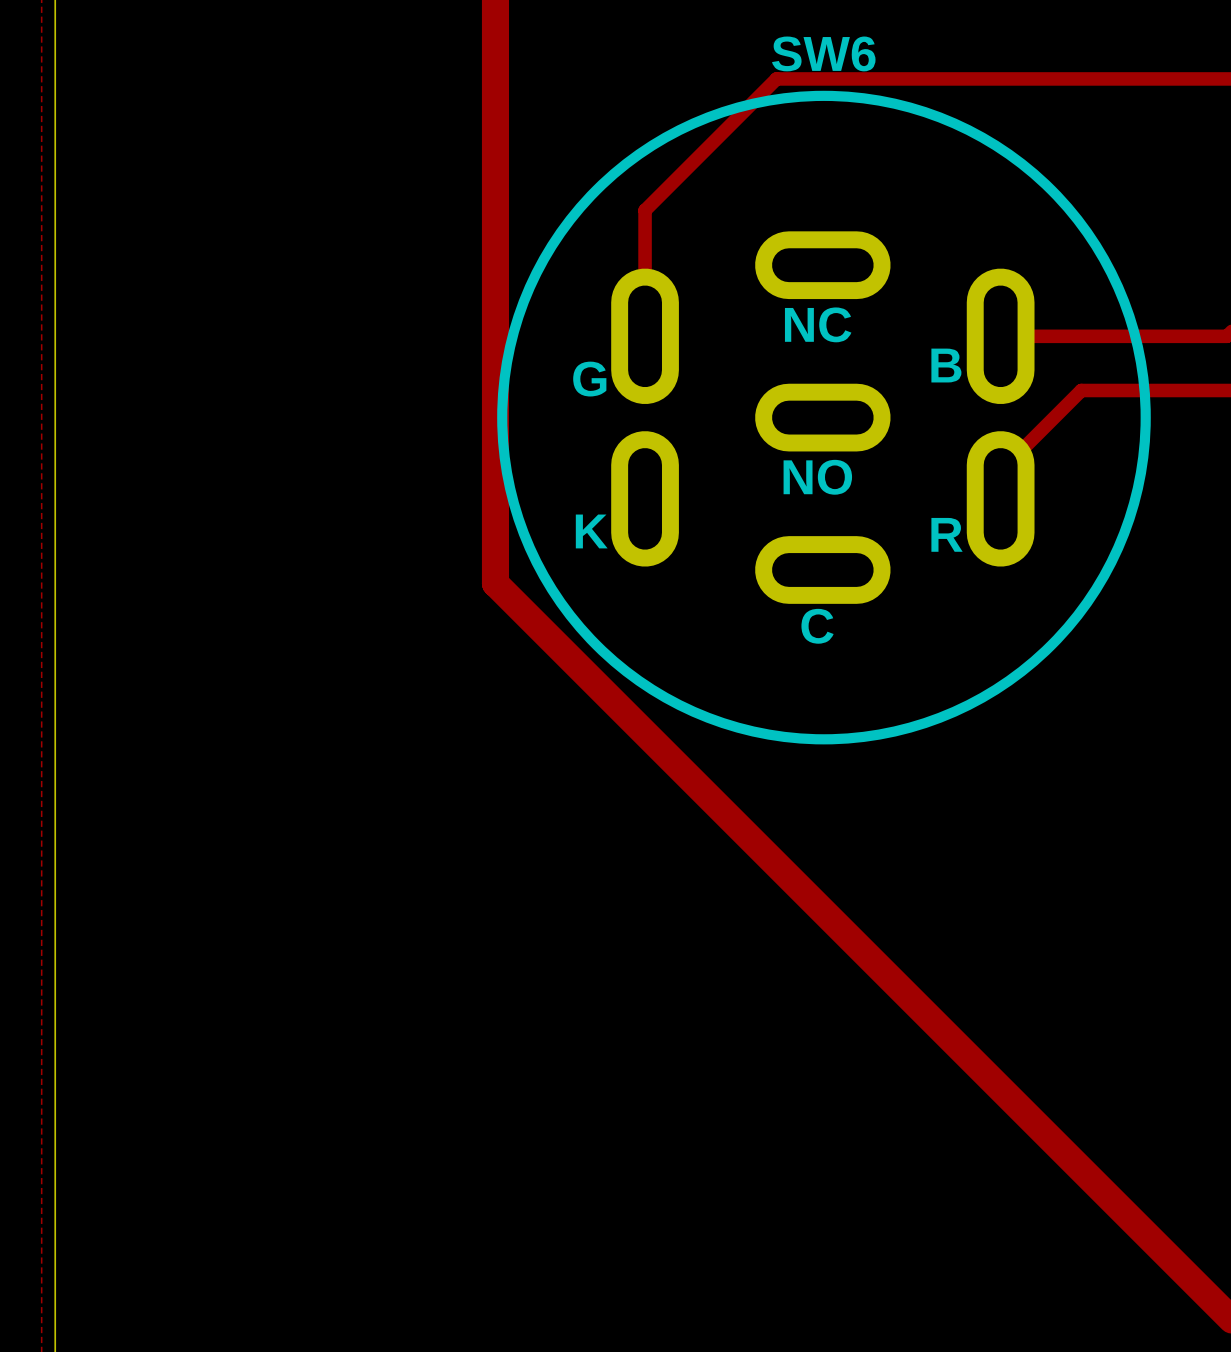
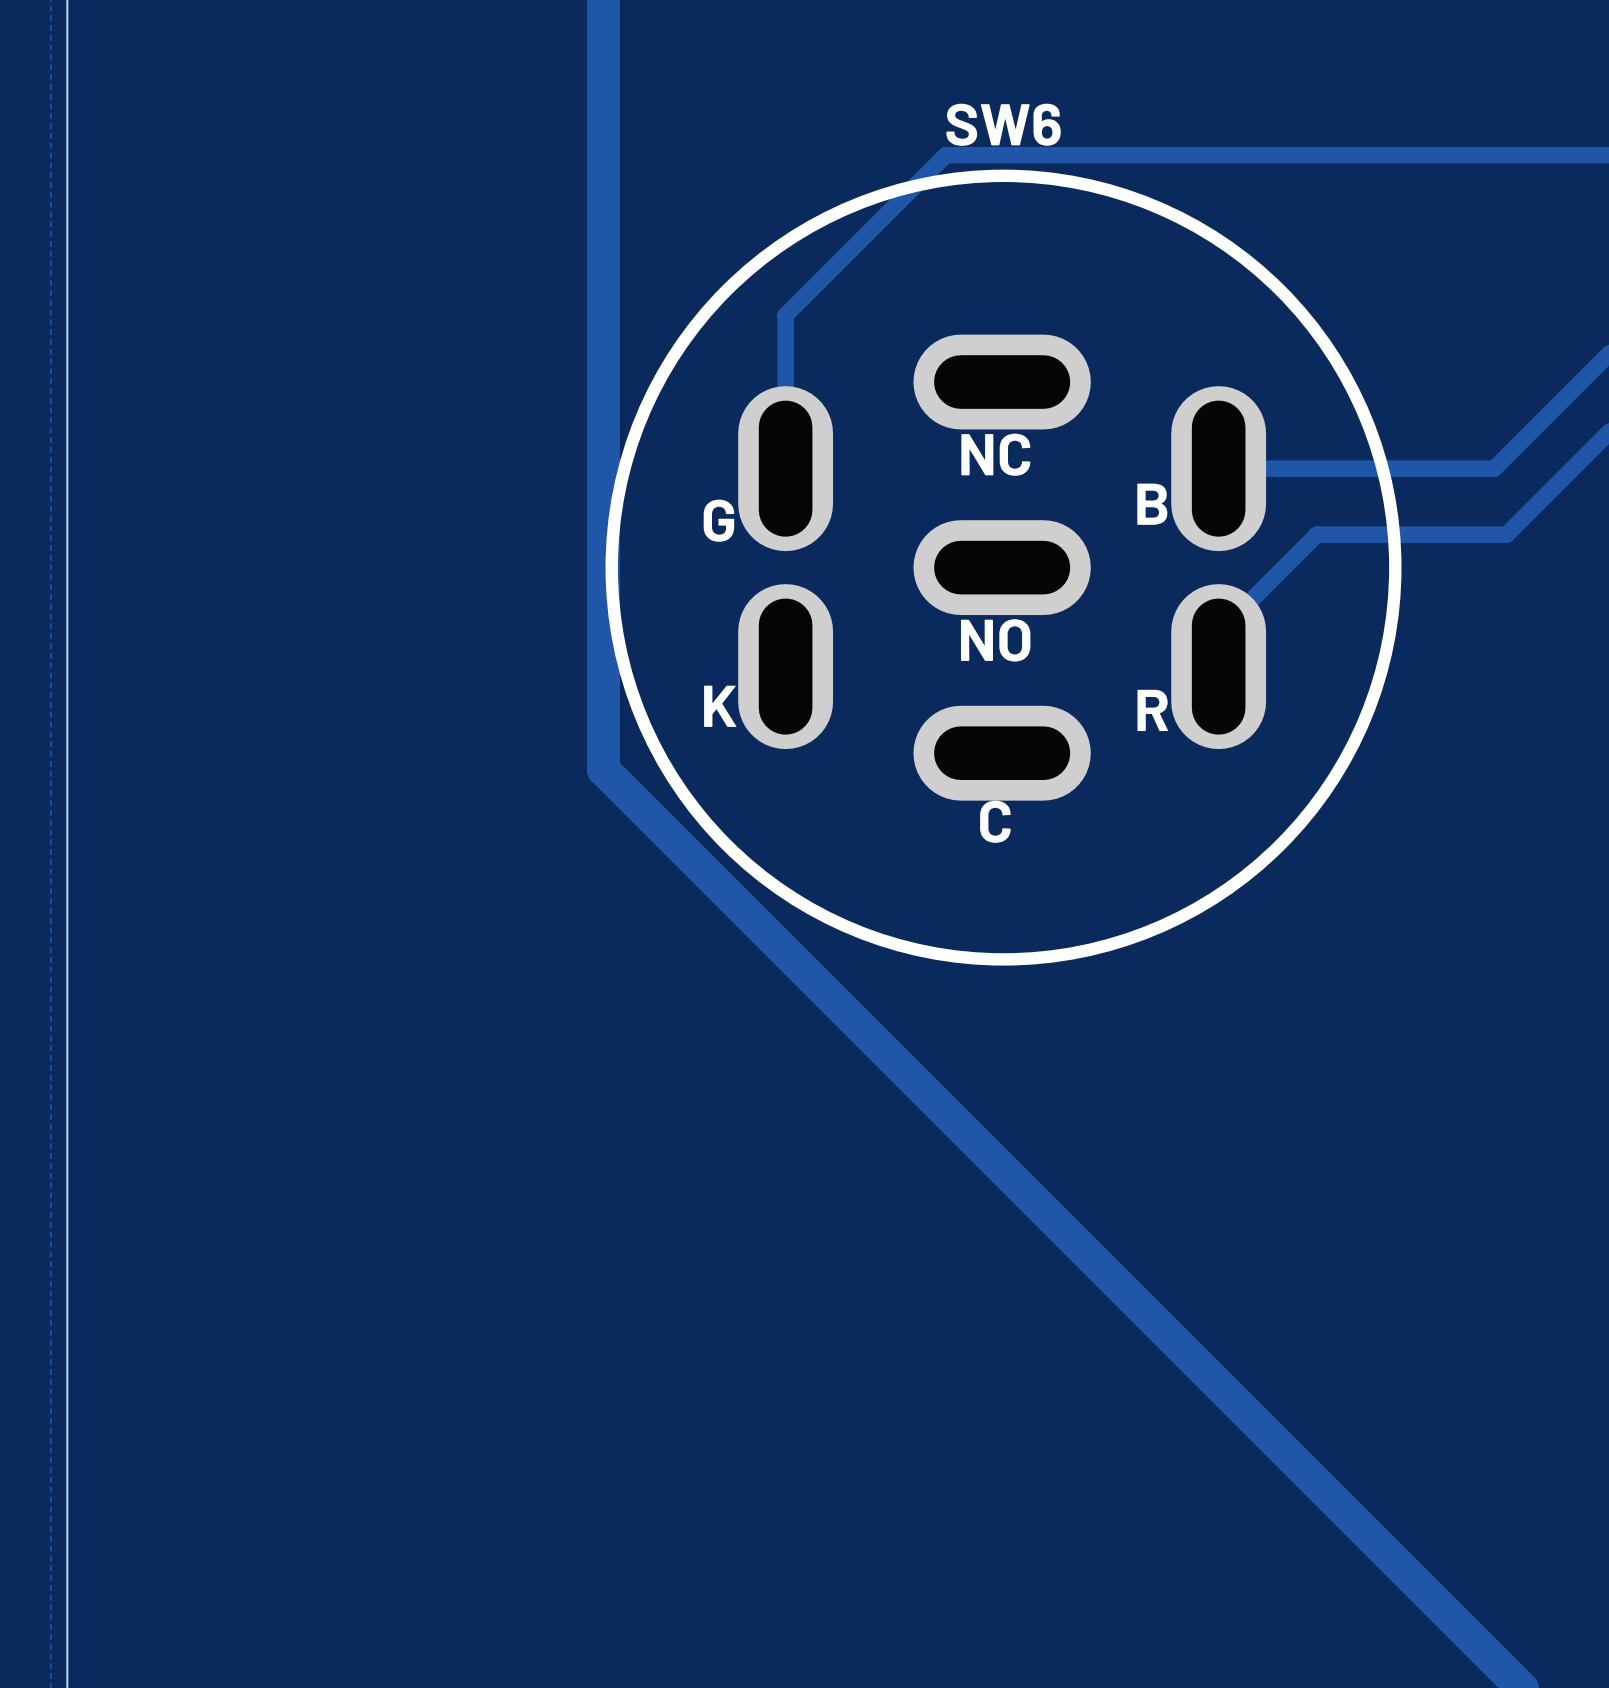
part footprint: [611, 231, 1035, 604] -> [738, 334, 1267, 801]

